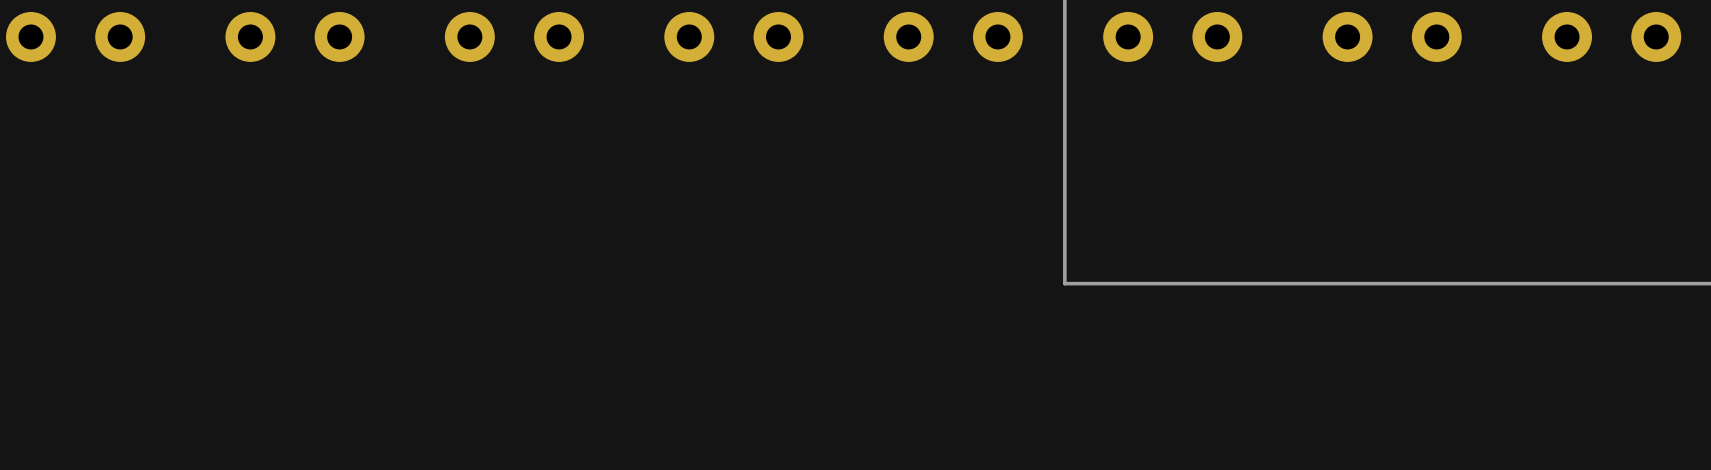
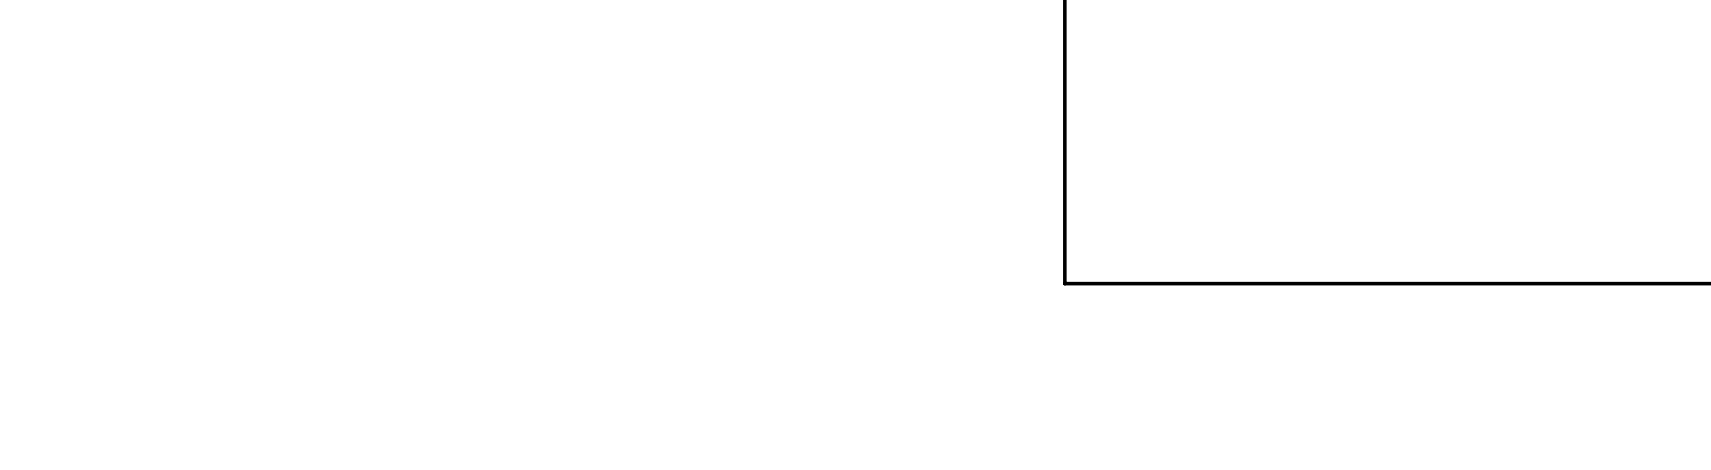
part: (75, 36) -> none
part: (295, 36) -> none
part: (514, 36) -> none
part: (733, 36) -> none
part: (953, 36) -> none
part: (1172, 36) -> none
part: (1392, 36) -> none
part: (1611, 36) -> none

